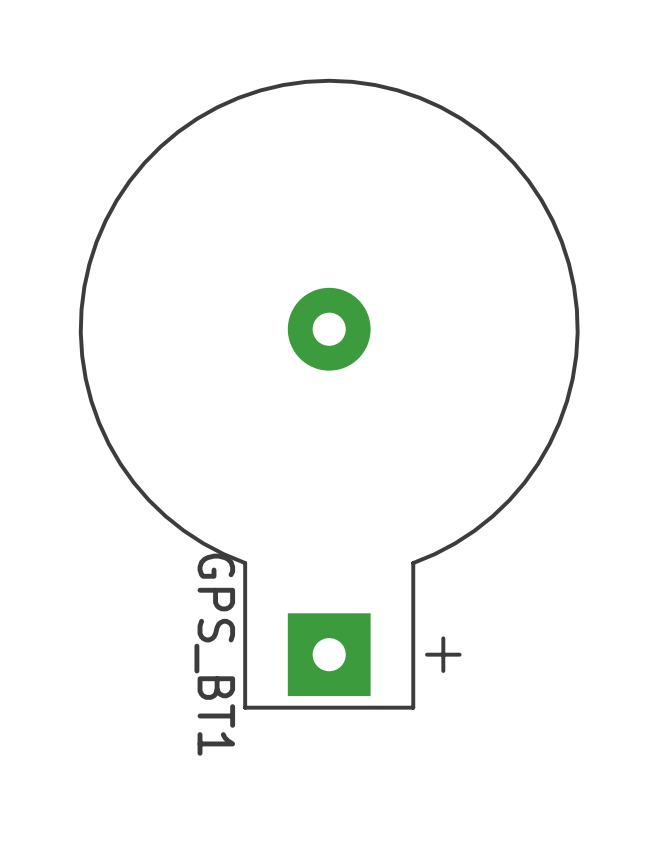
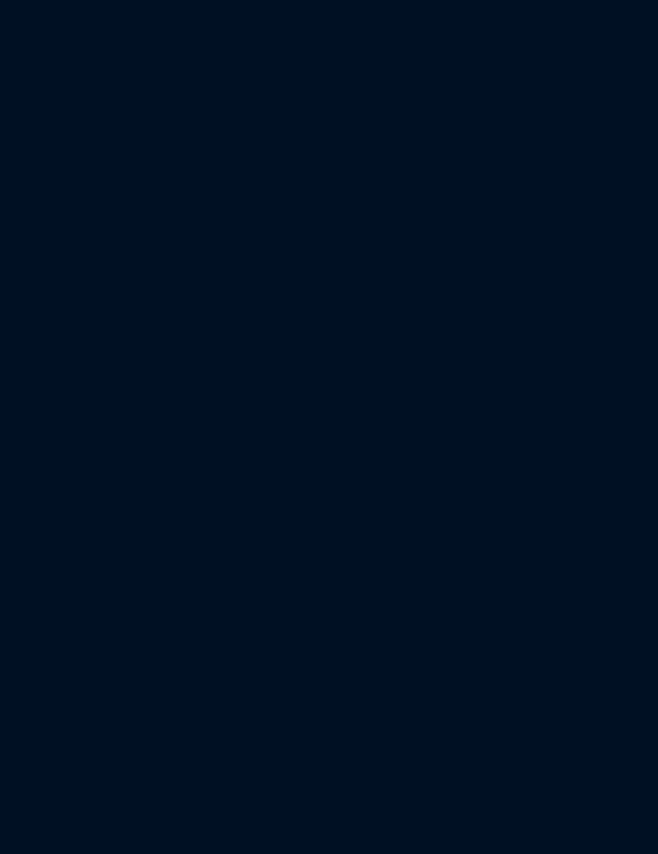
GPS_BT1: (329, 394) -> none

